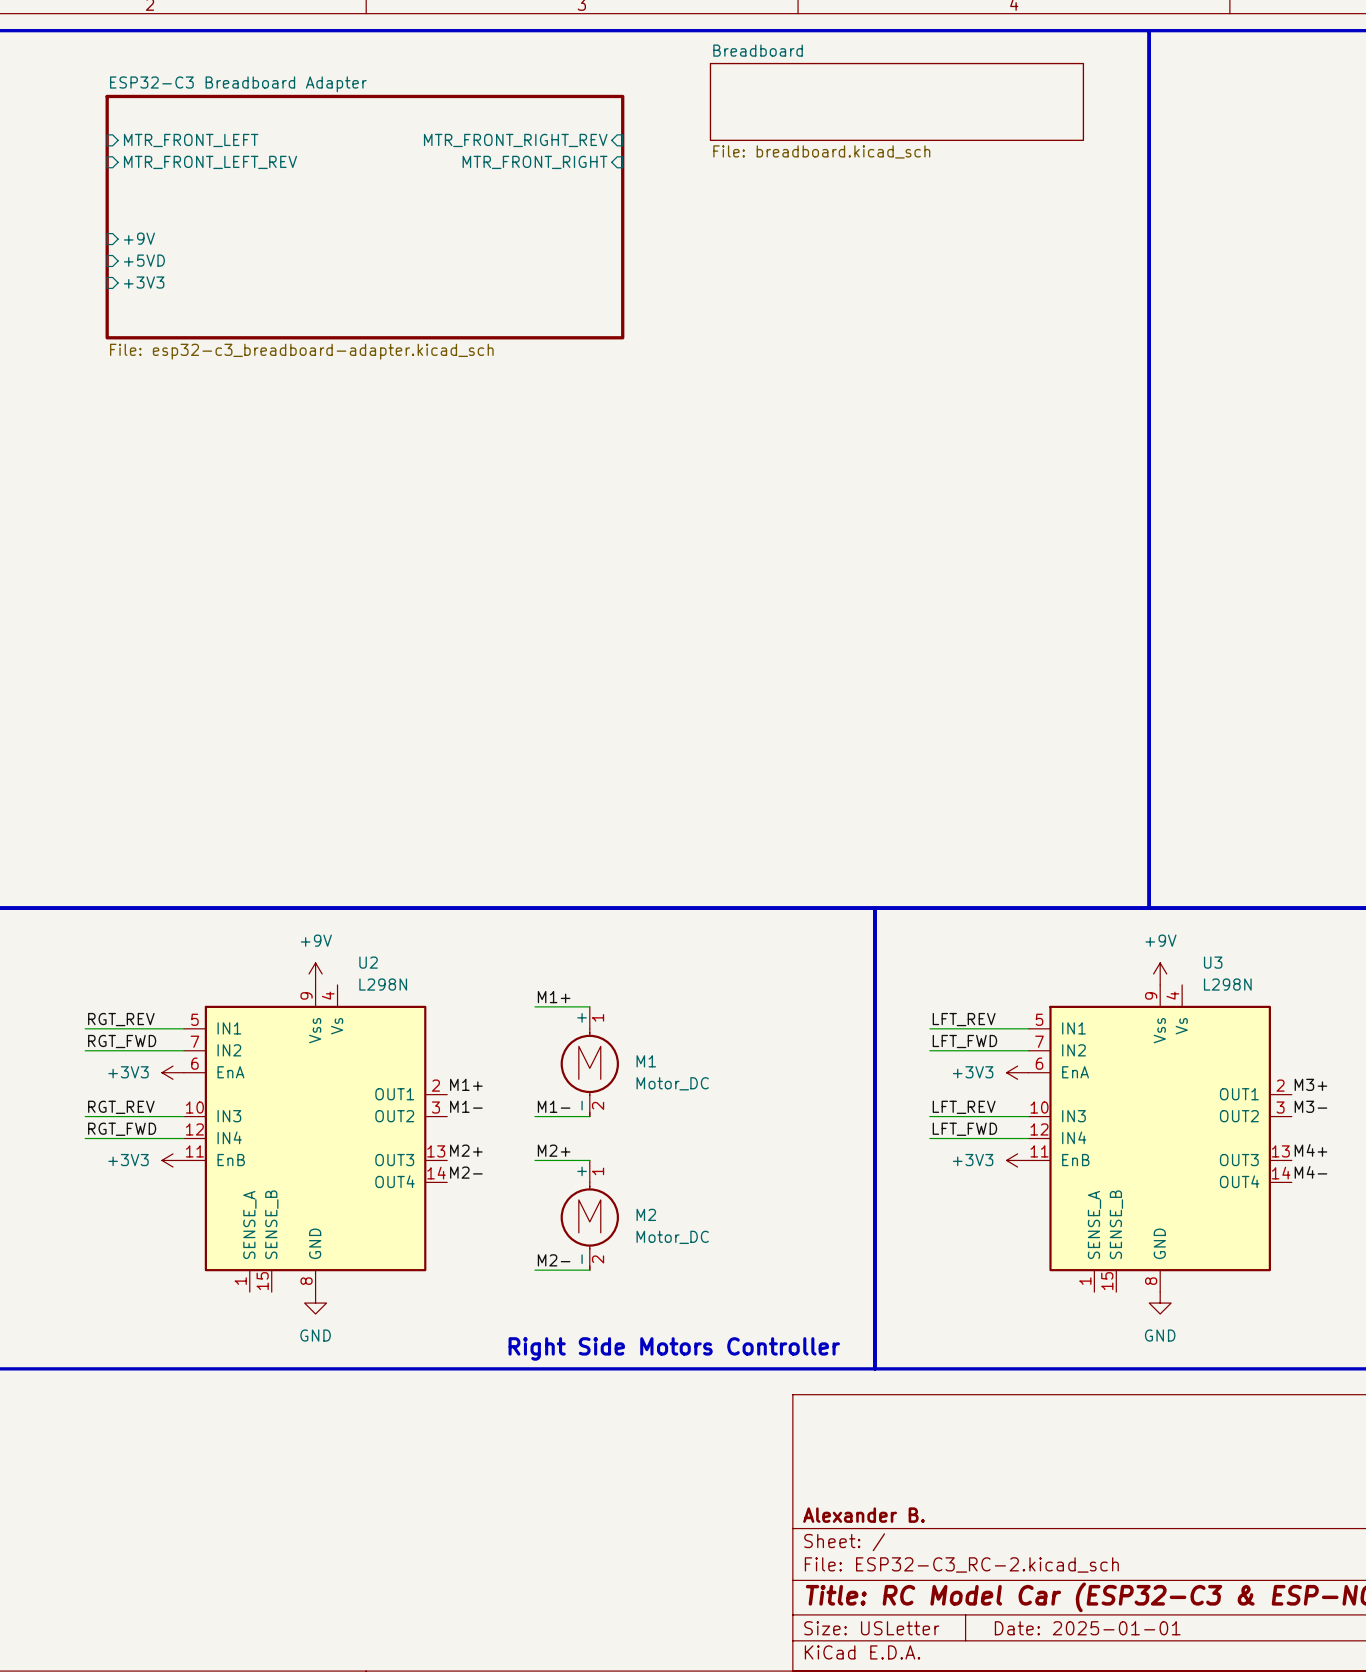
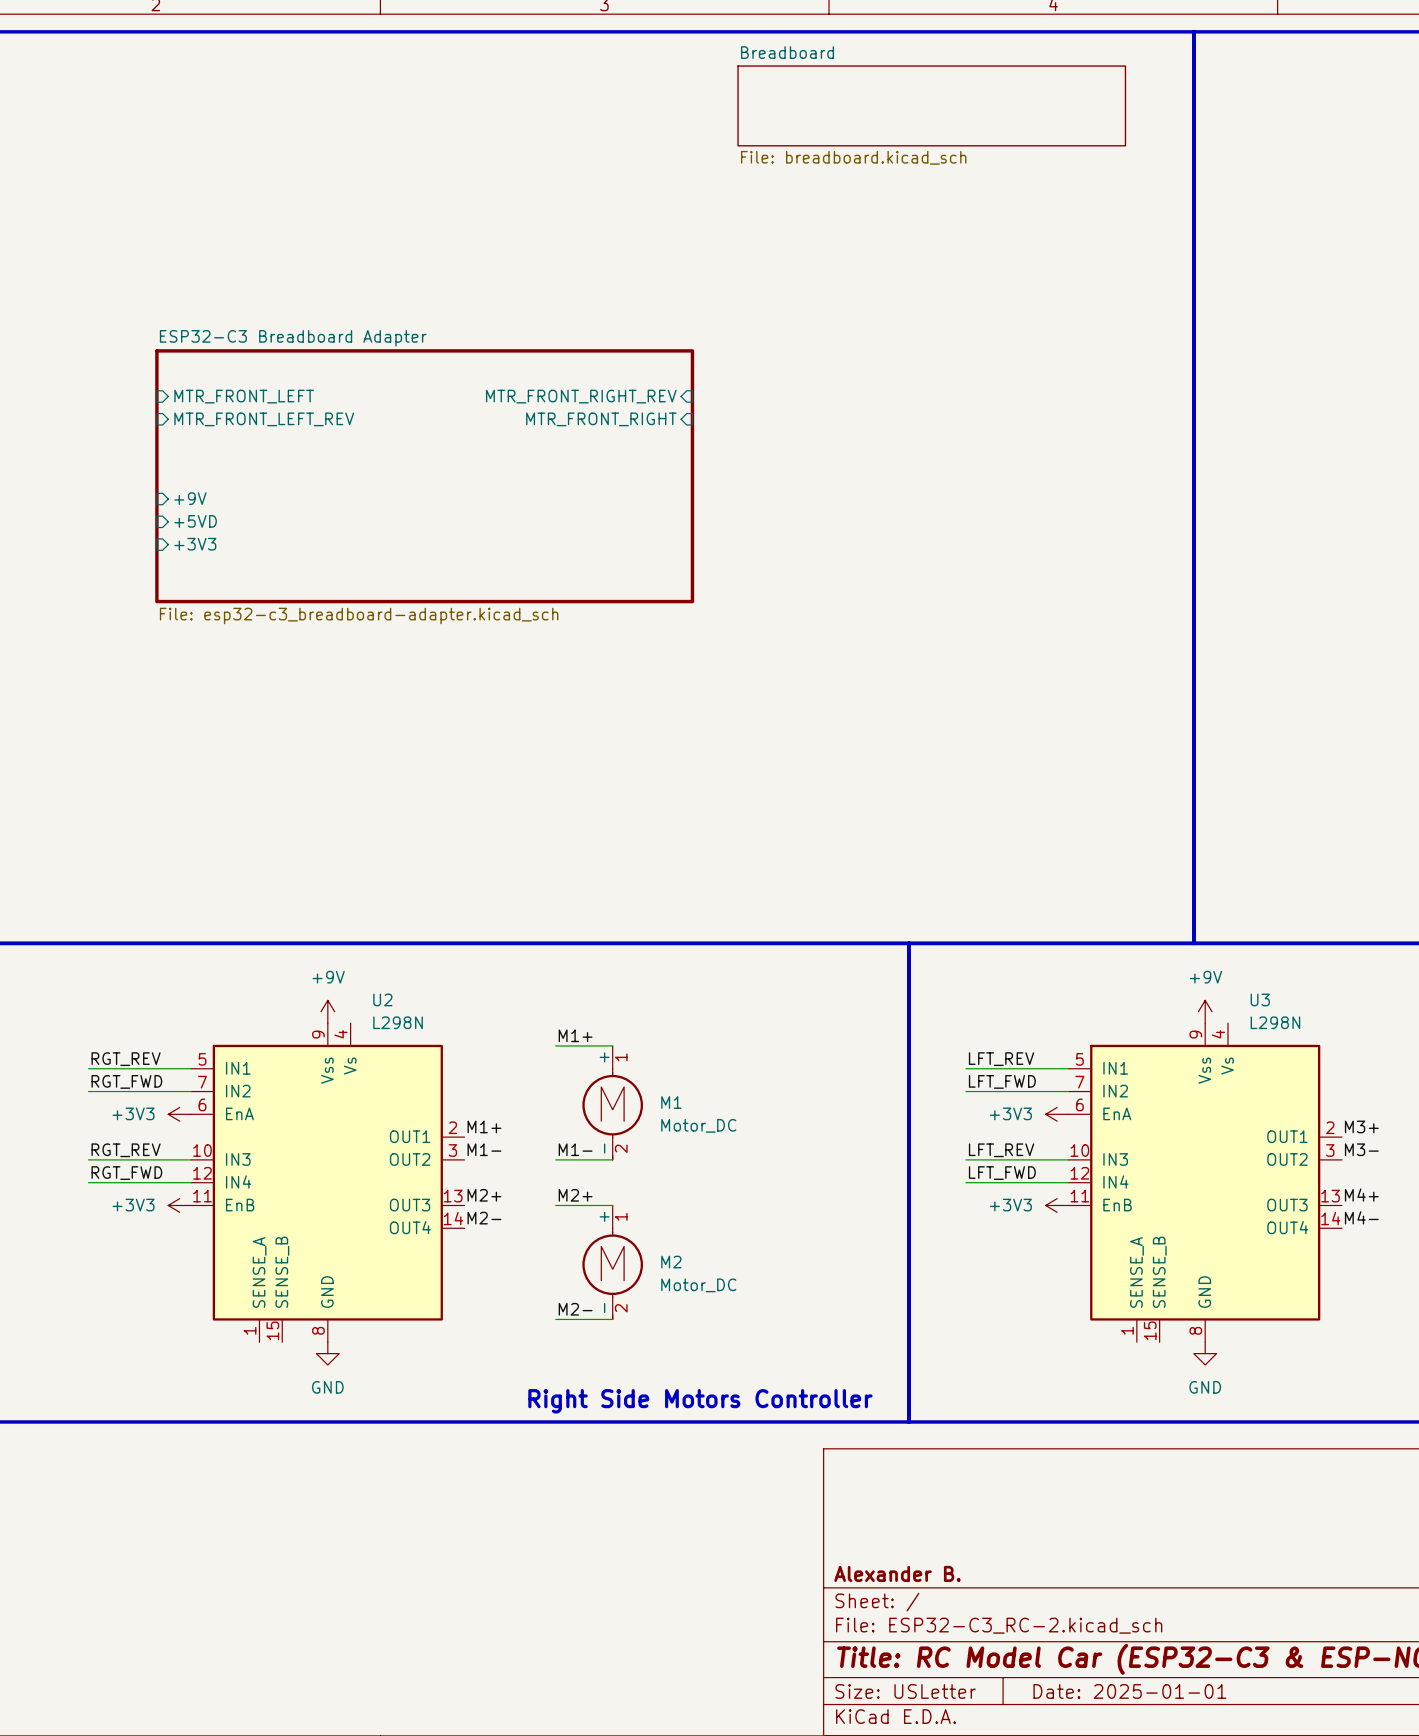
sheet pin: MTR_FRONT_LEFT (191, 140) -> none
sheet pin: MTR_FRONT_RIGHT_REV (515, 140) -> none
sheet pin: MTR_FRONT_LEFT_REV (210, 162) -> none
sheet pin: MTR_FRONT_RIGHT (535, 162) -> none
sheet ESP32-C3 Breadboard Adapter position: (364, 217) -> (424, 476)
sheet pin: +9V (139, 238) -> none
sheet pin: +5VD (144, 260) -> none
sheet pin: +3V3 (144, 282) -> none
sheet pin: none -> MTR_FRONT_LEFT (244, 396)
sheet pin: none -> MTR_FRONT_RIGHT_REV (581, 396)
sheet pin: none -> MTR_FRONT_LEFT_REV (264, 419)
sheet pin: none -> MTR_FRONT_RIGHT (601, 419)
sheet pin: none -> +9V (190, 498)
sheet pin: none -> +5VD (195, 521)
sheet pin: none -> +3V3 (195, 544)

